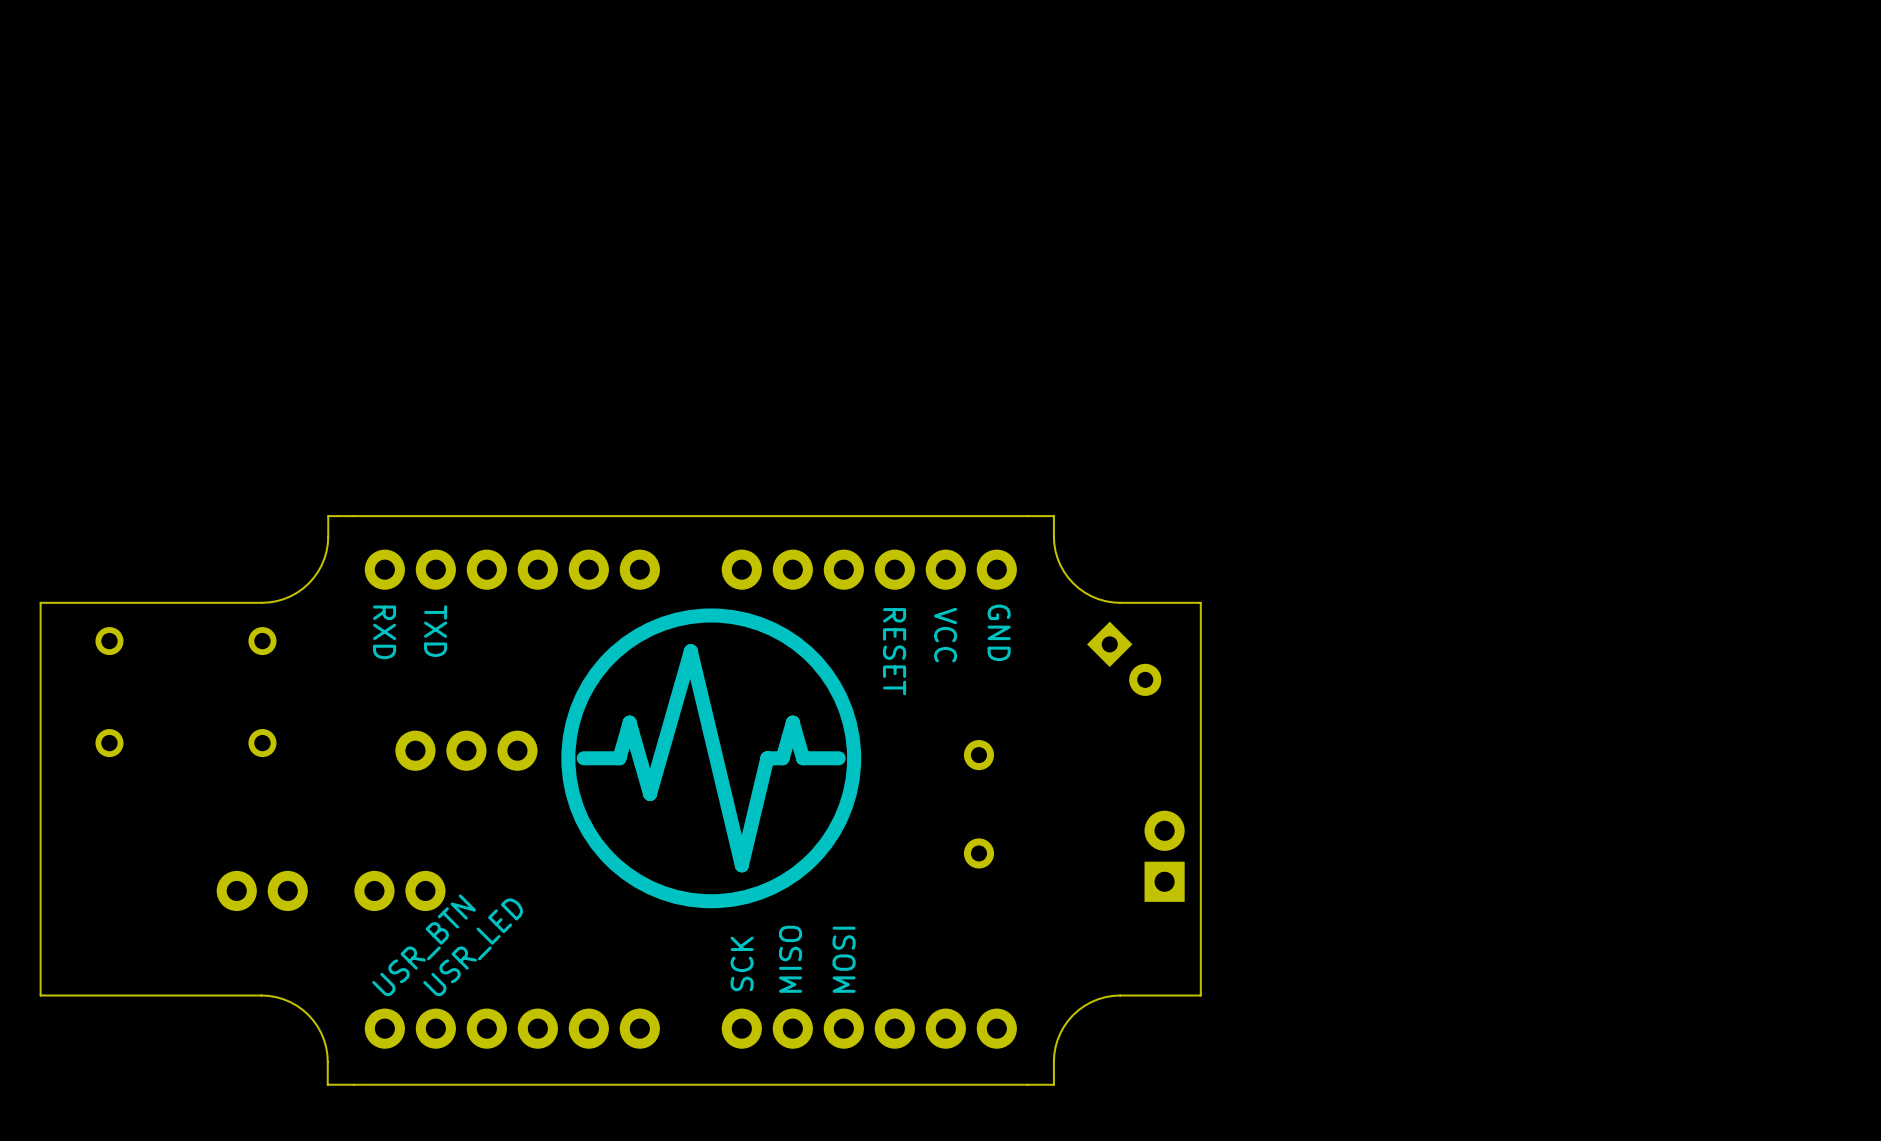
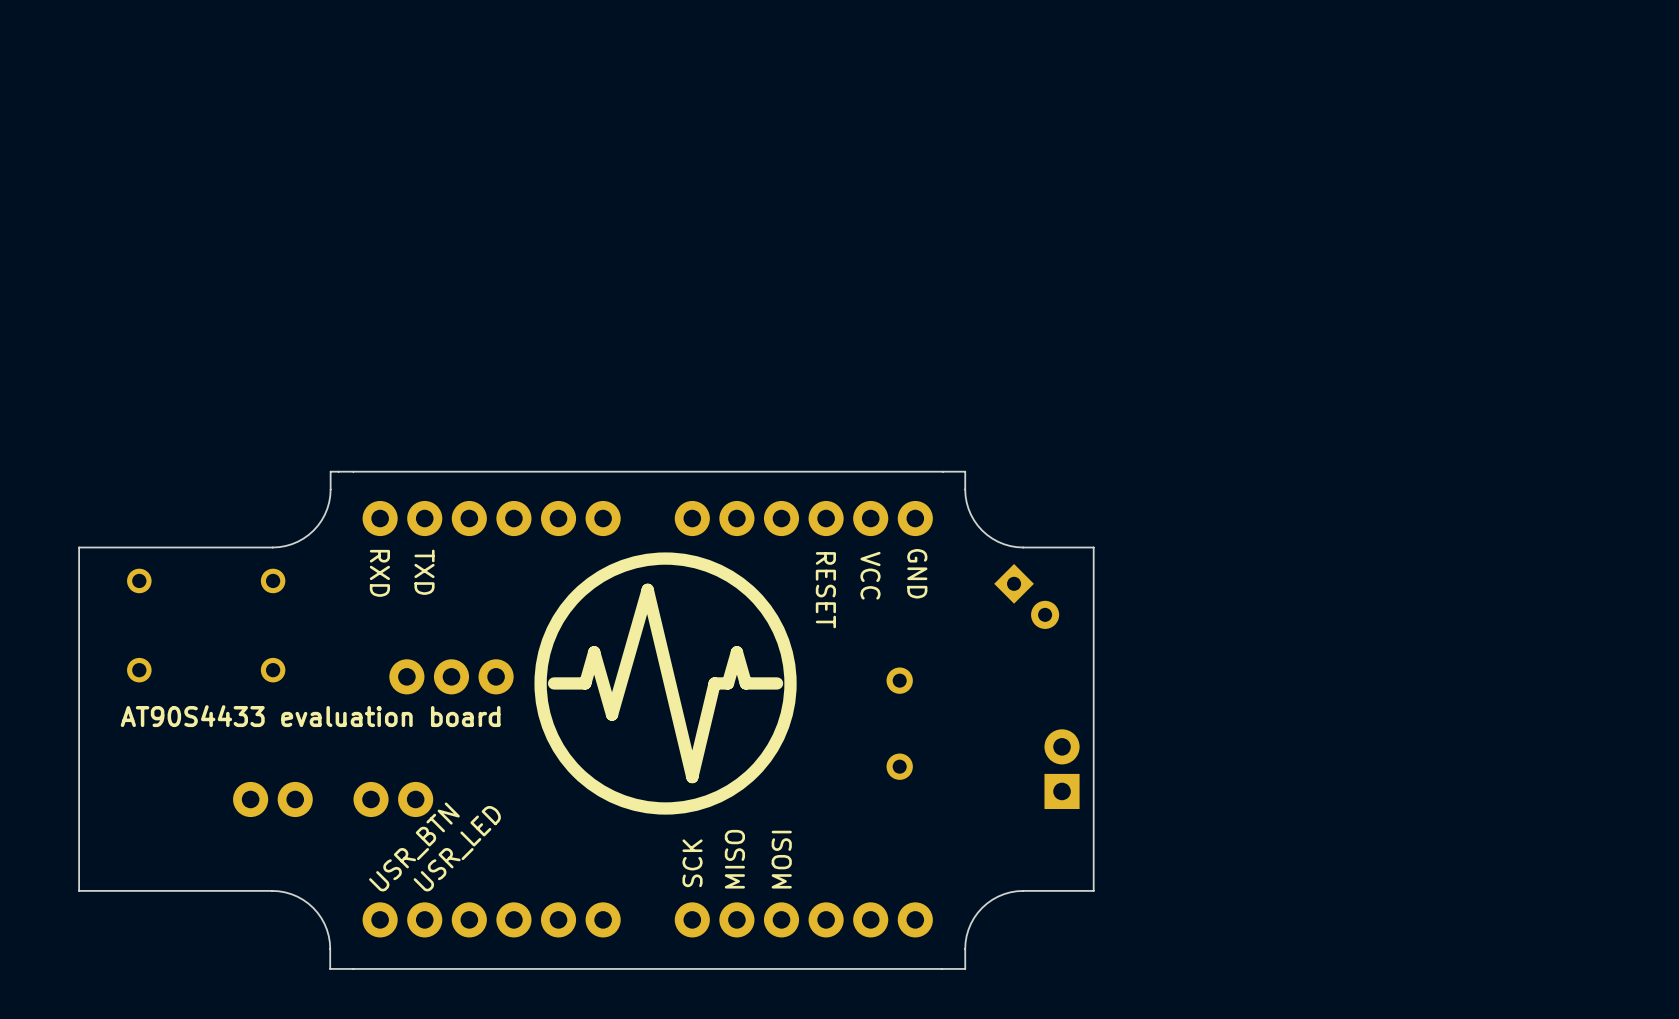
text: none -> AT90S4433 evaluation board (310, 716)

